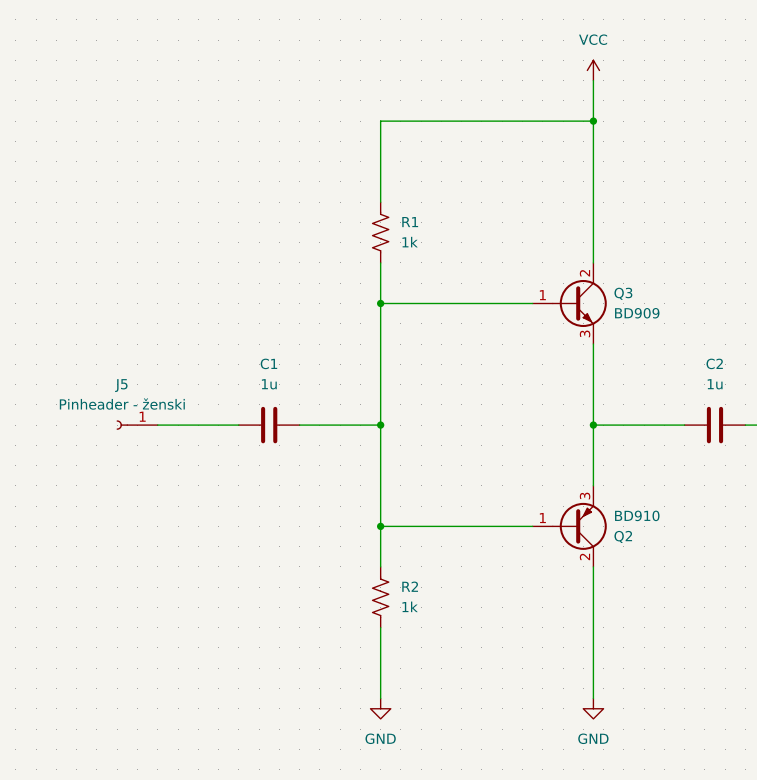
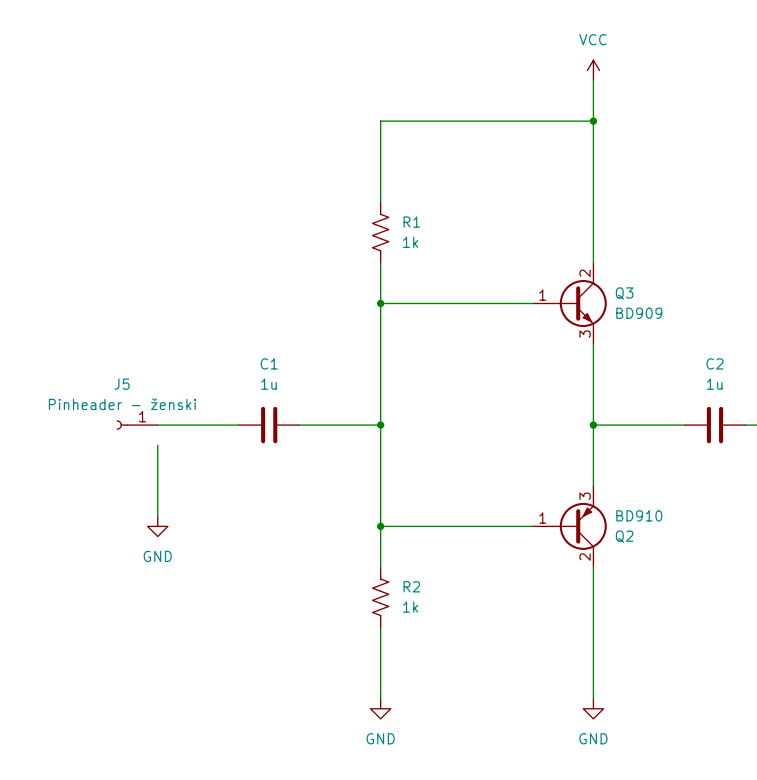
wire: none -> (157, 445) (157, 516)
power symbol: none -> GND (157, 526)

